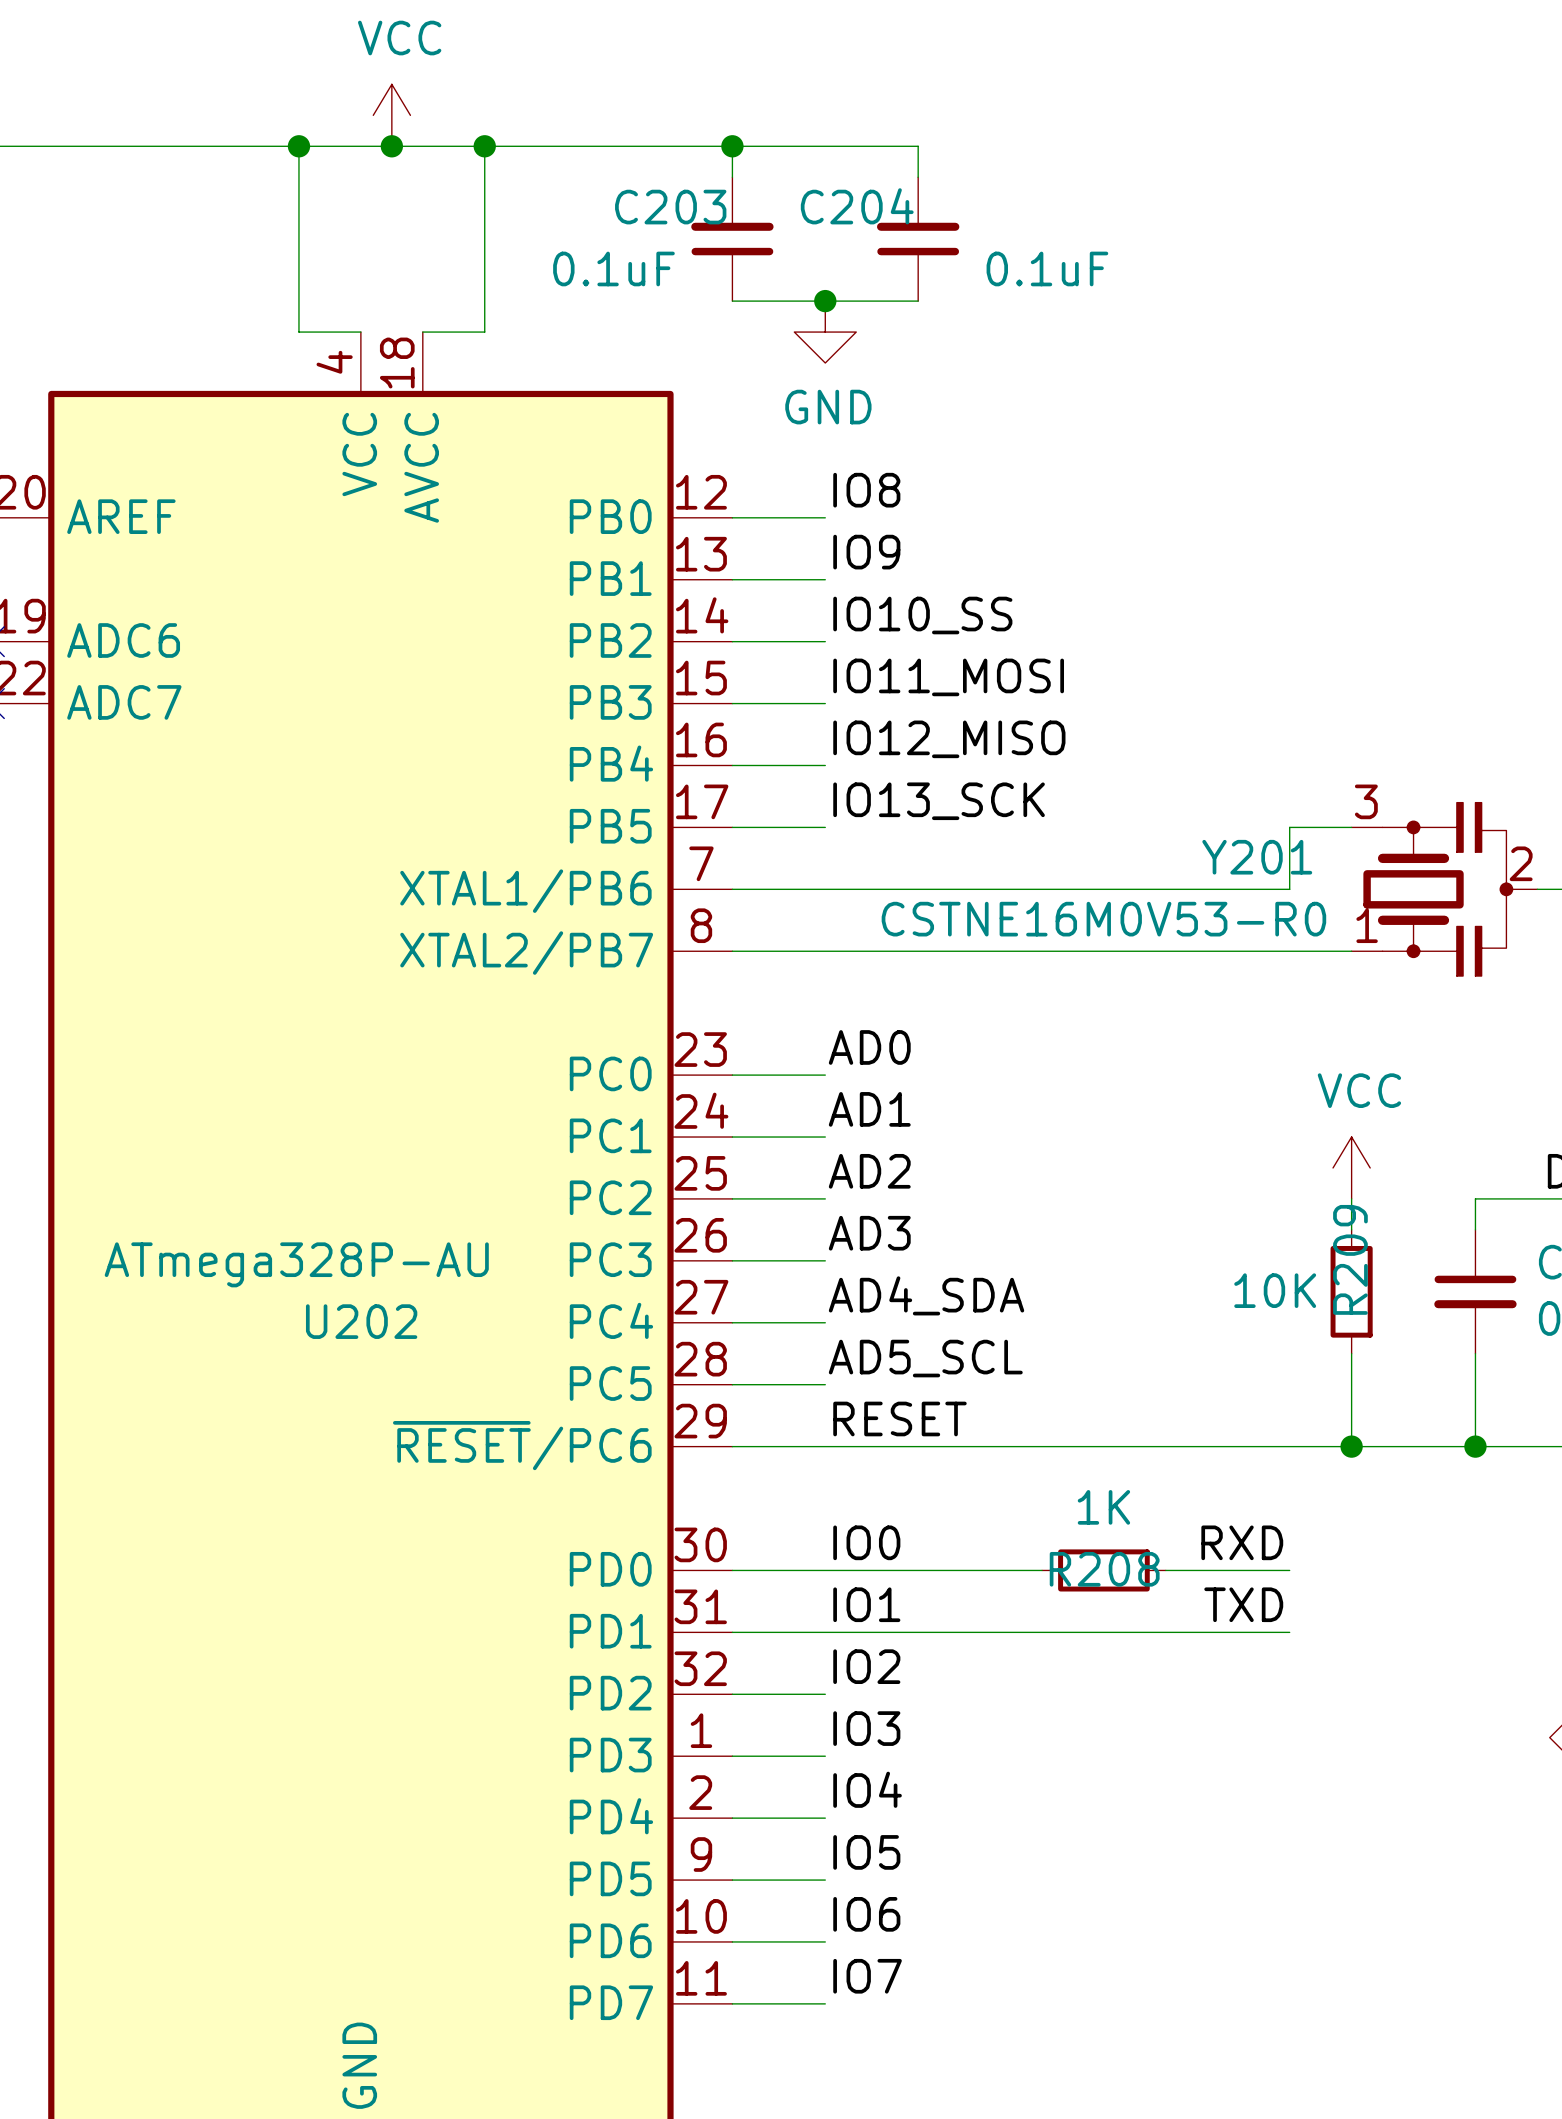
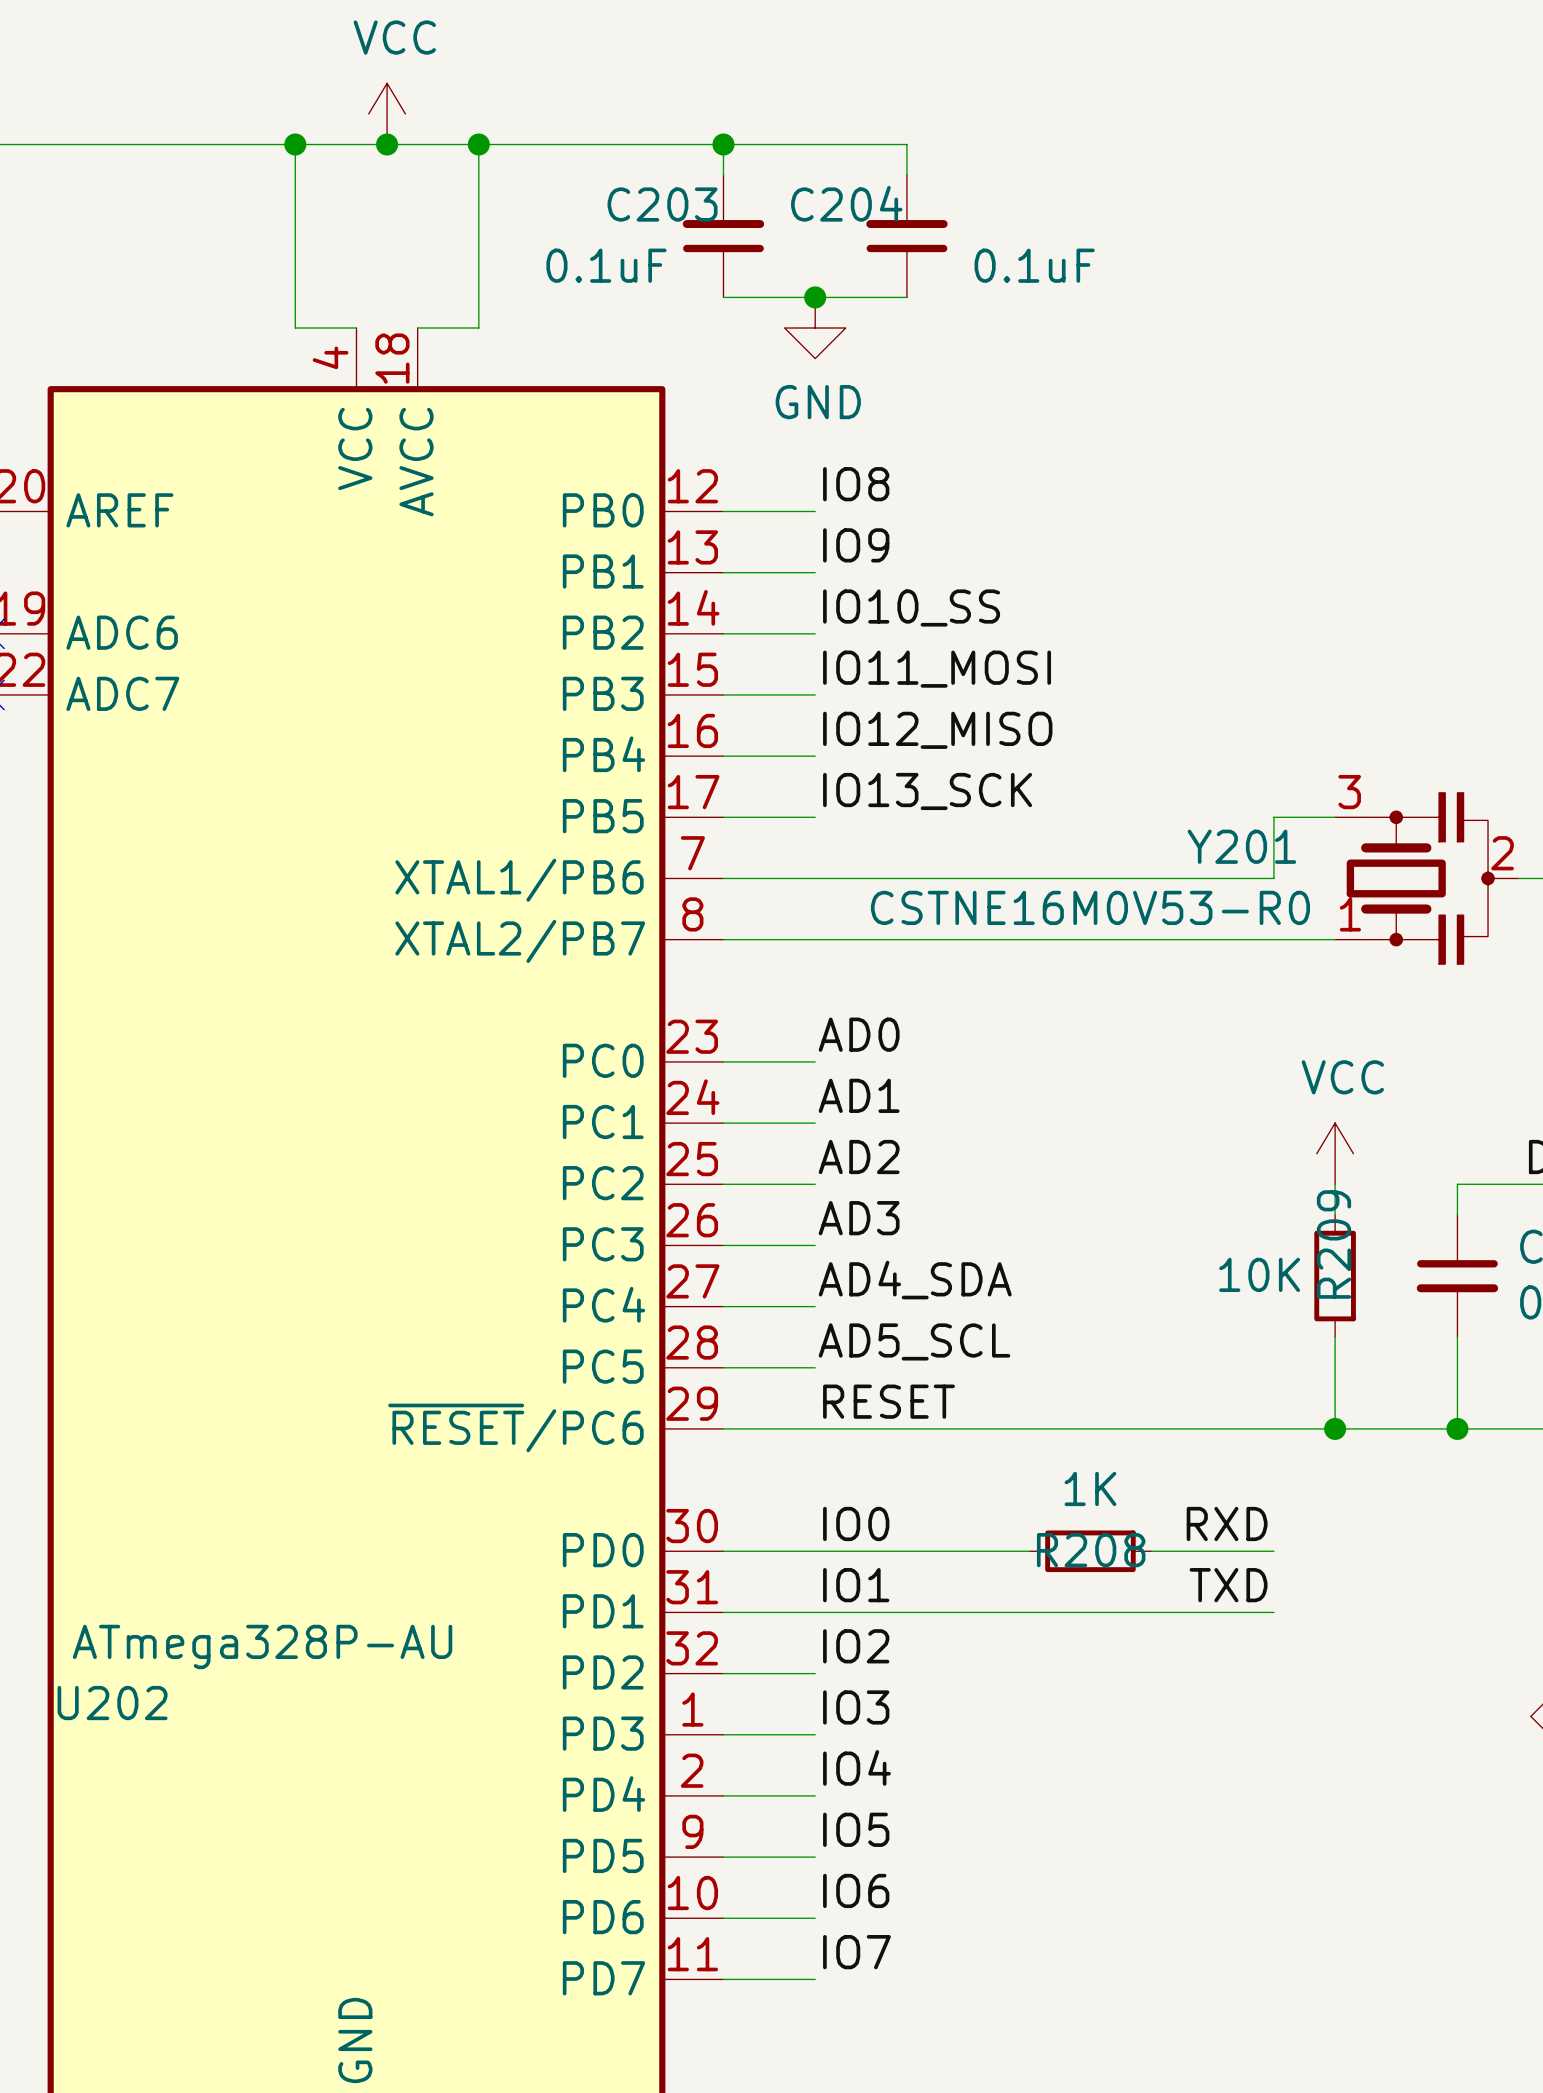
U202 value position: ATmega328P-AU (296, 1264) -> ATmega328P-AU (262, 1646)
U202 name position: U202 (361, 1321) -> U202 (112, 1703)

